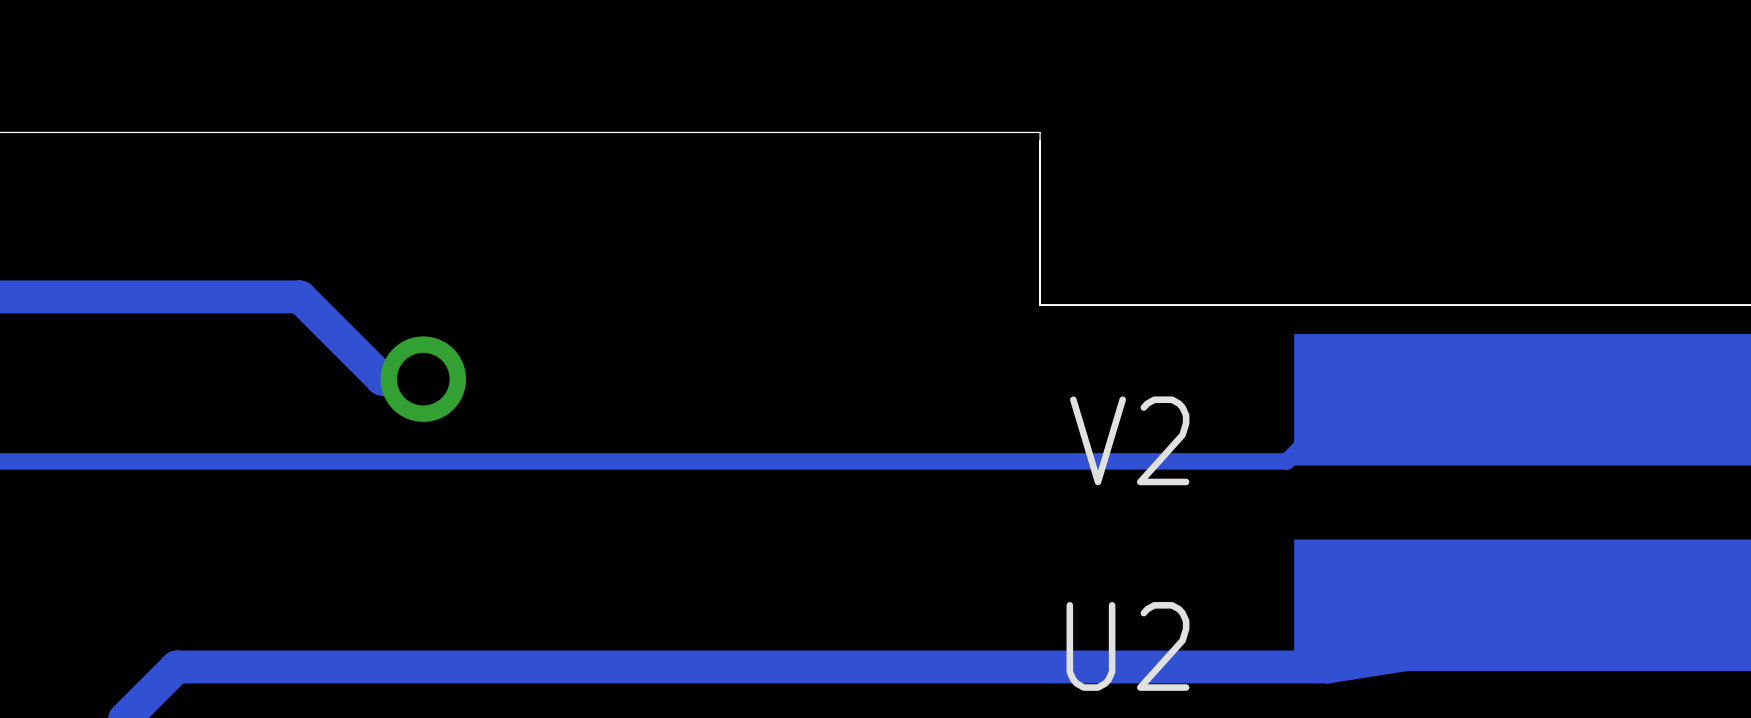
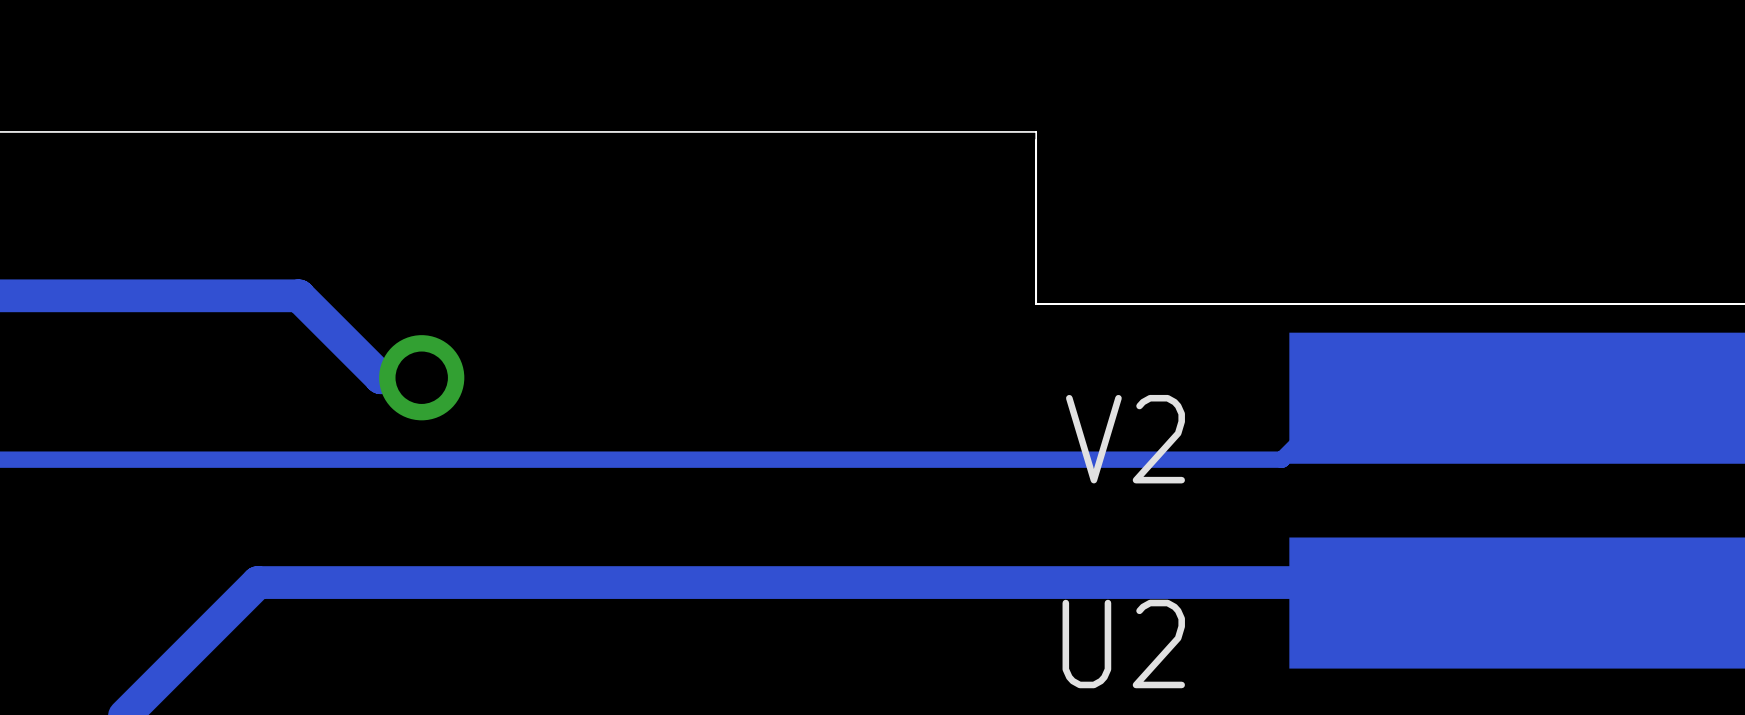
track: (1718, 605) (1327, 666) (176, 666) -> (1712, 603) (1404, 582) (257, 582) (175, 664)

